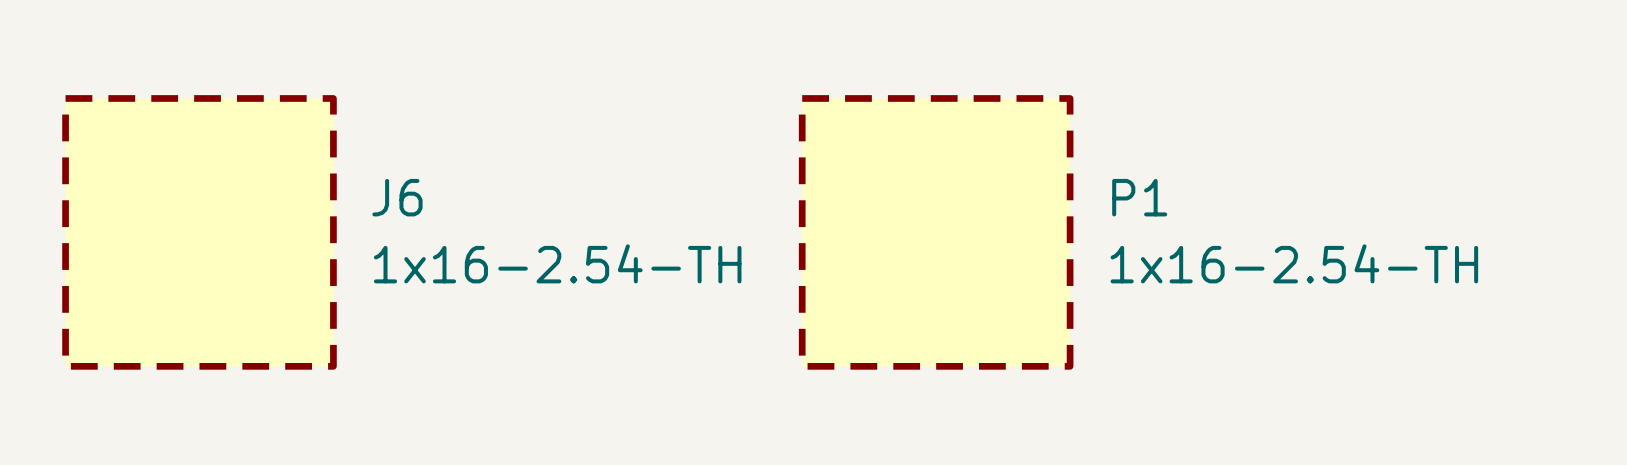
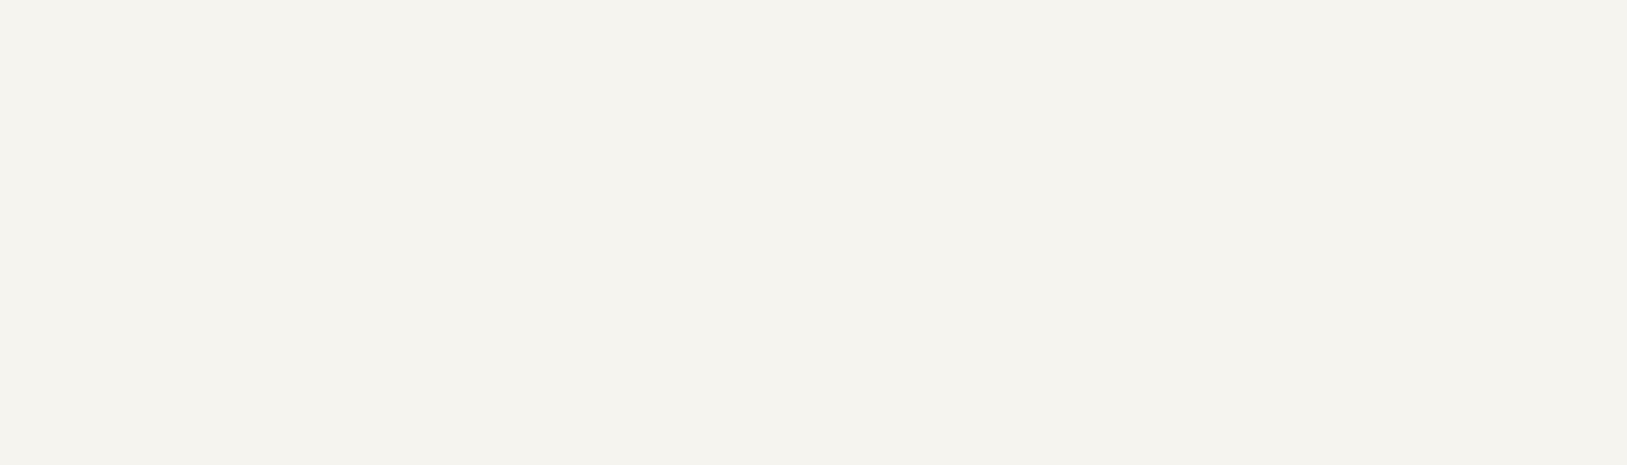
J6: 1x16-2.54-TH (199, 232) -> none
P1: 1x16-2.54-TH (936, 232) -> none

